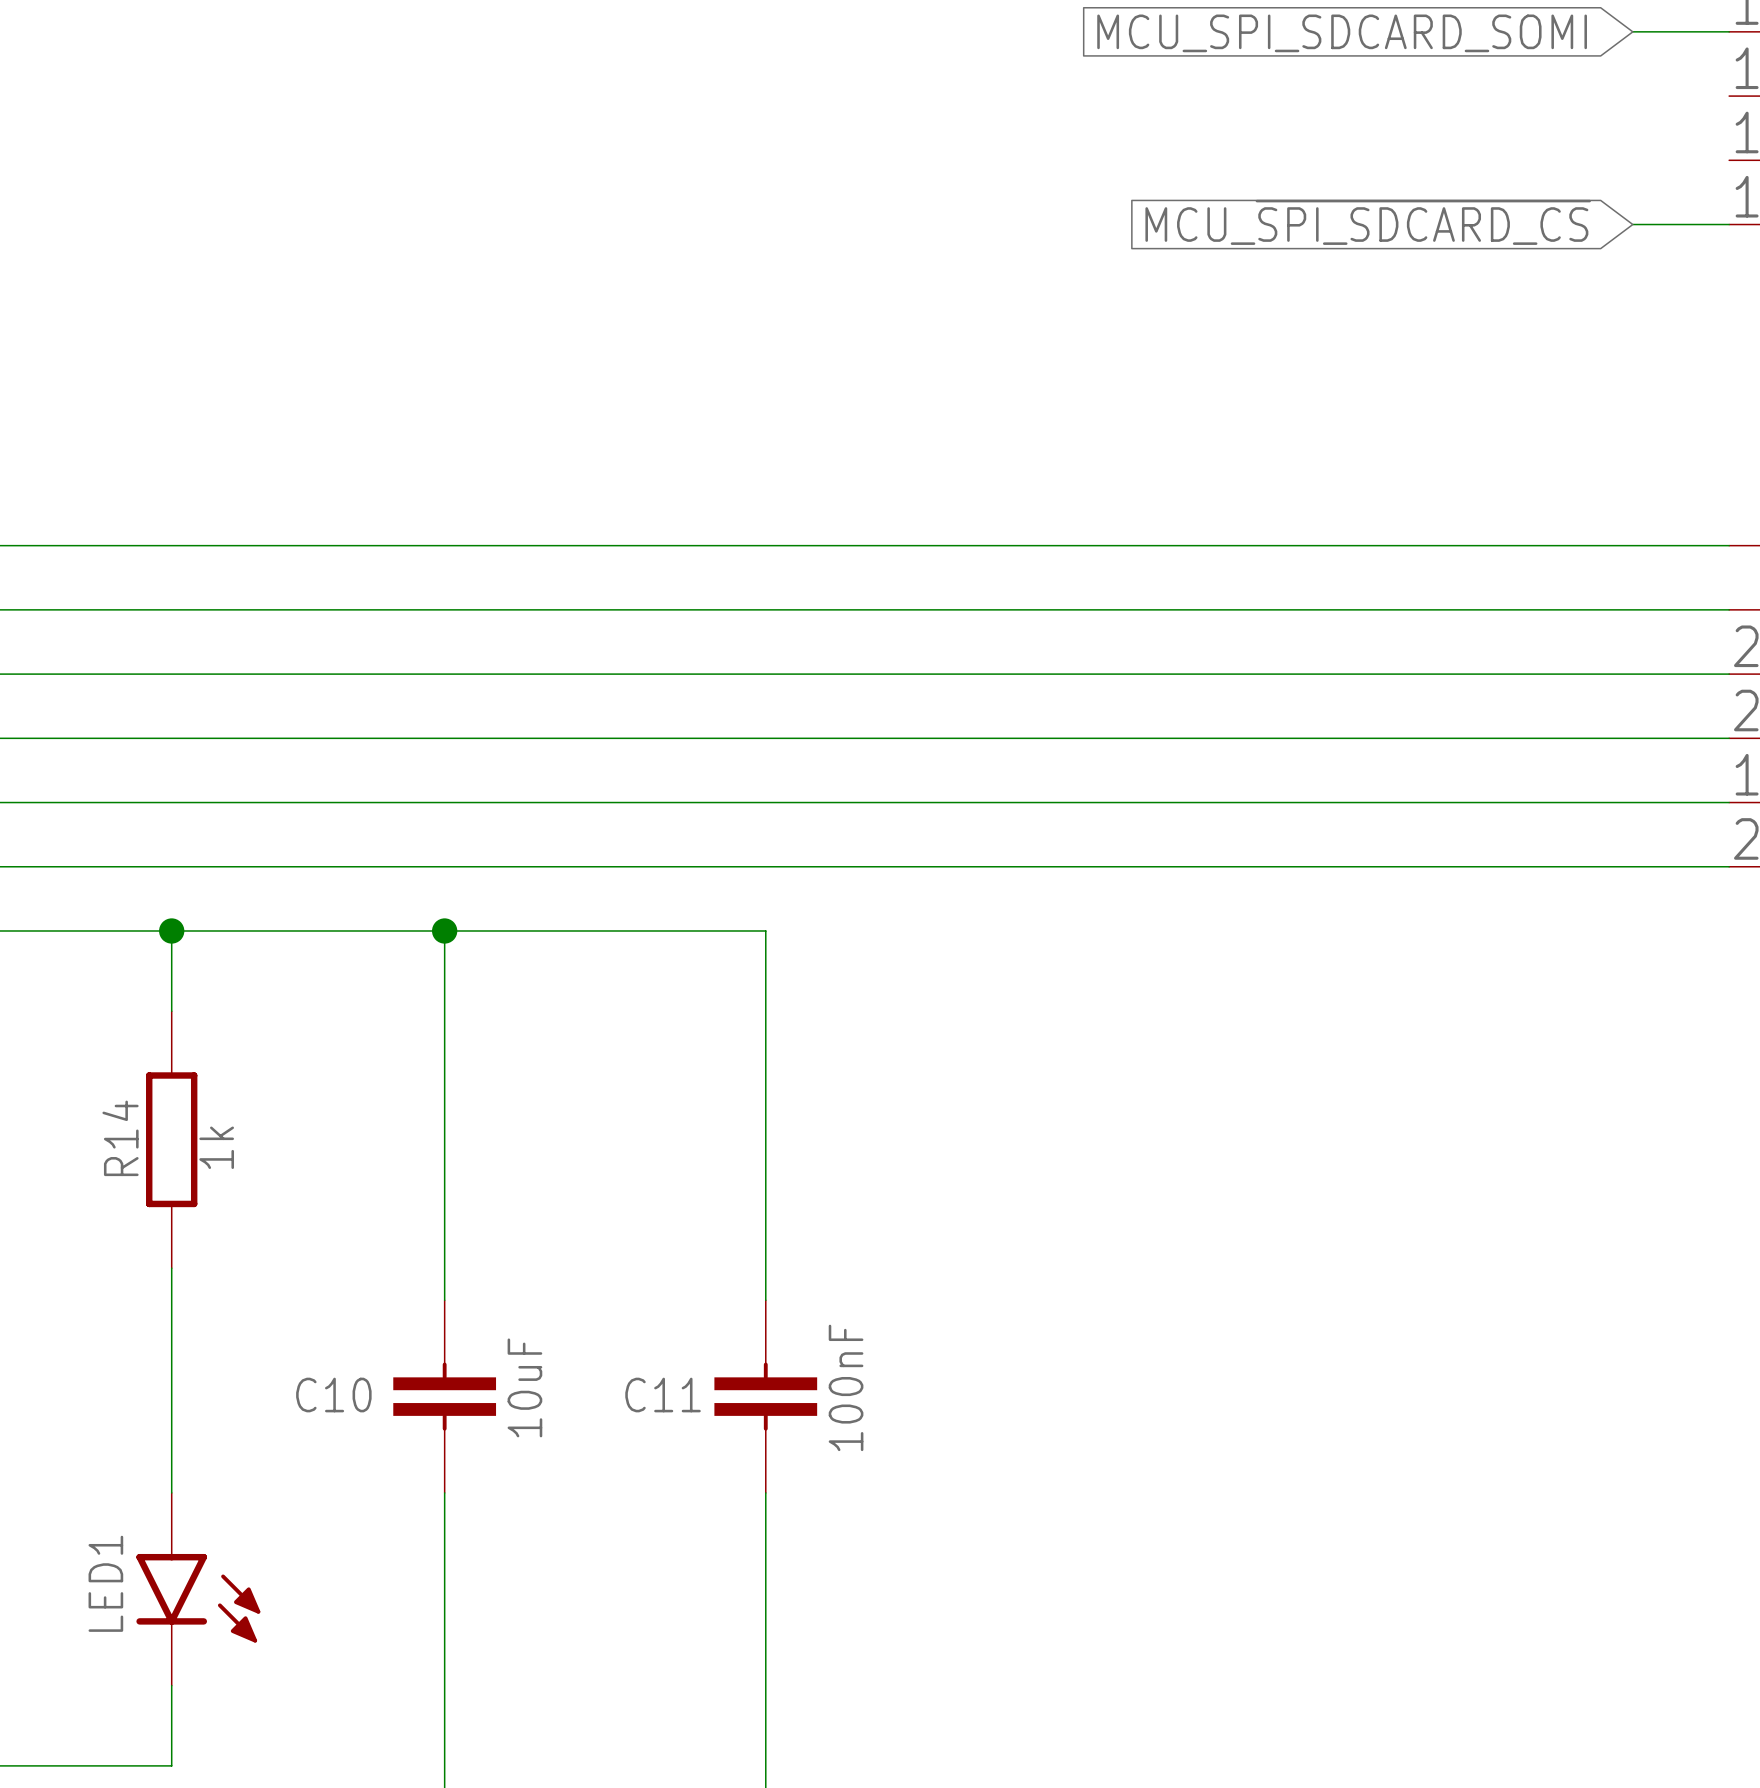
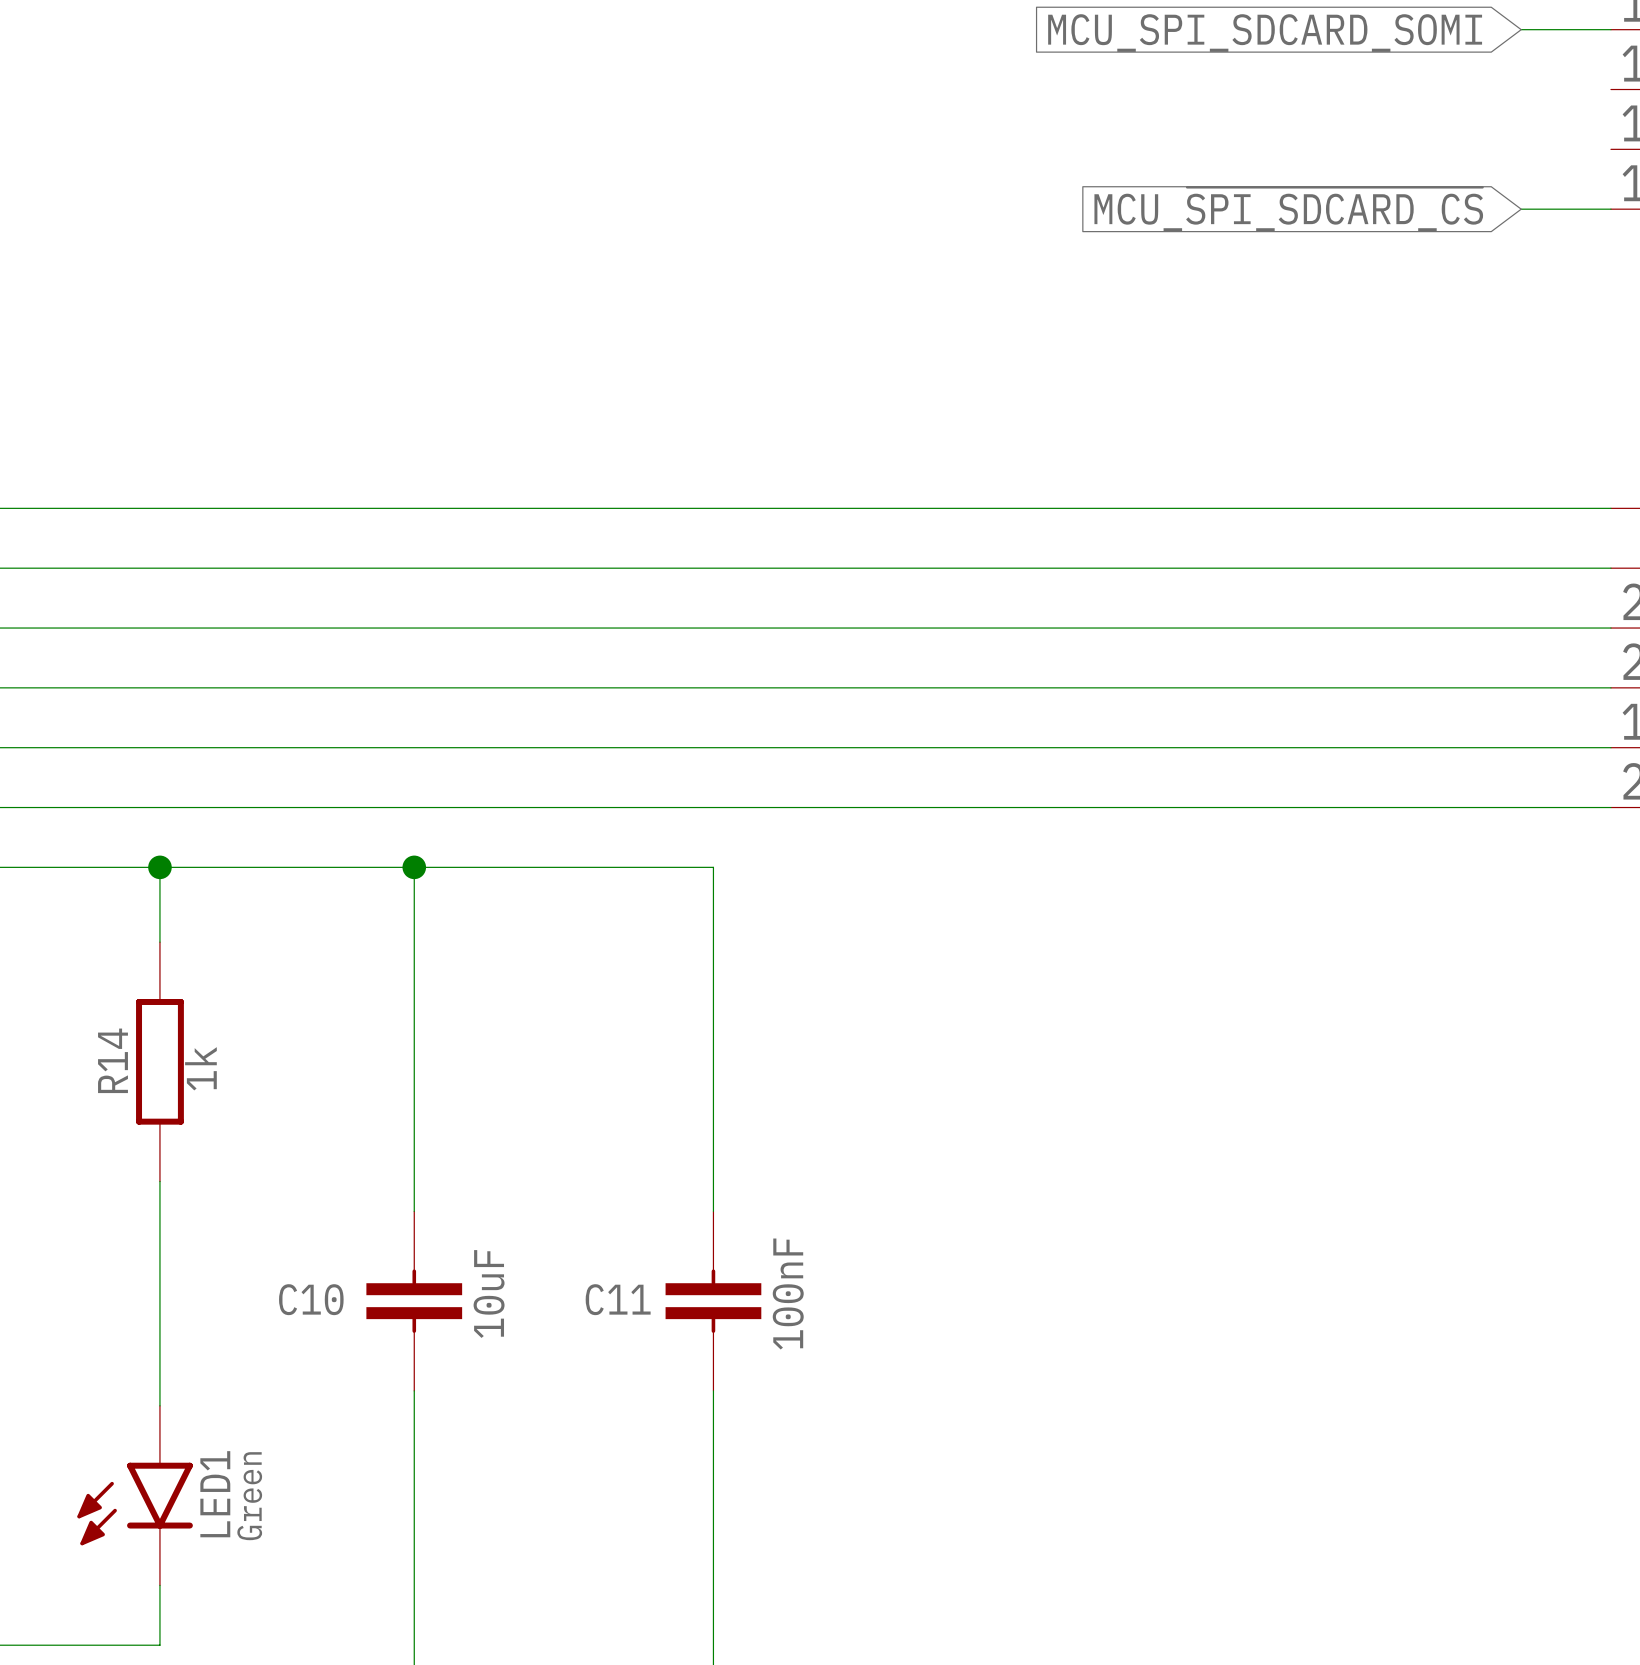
LED1 symbol: [136, 1492, 261, 1686] -> [77, 1405, 193, 1586]
LED1 name position: LED1 (105, 1583) -> LED1 (215, 1494)
LED1 text: none -> Green (249, 1496)

